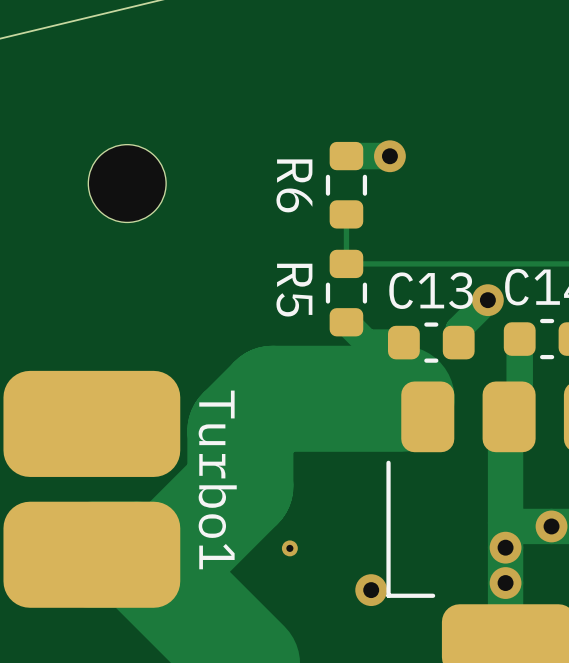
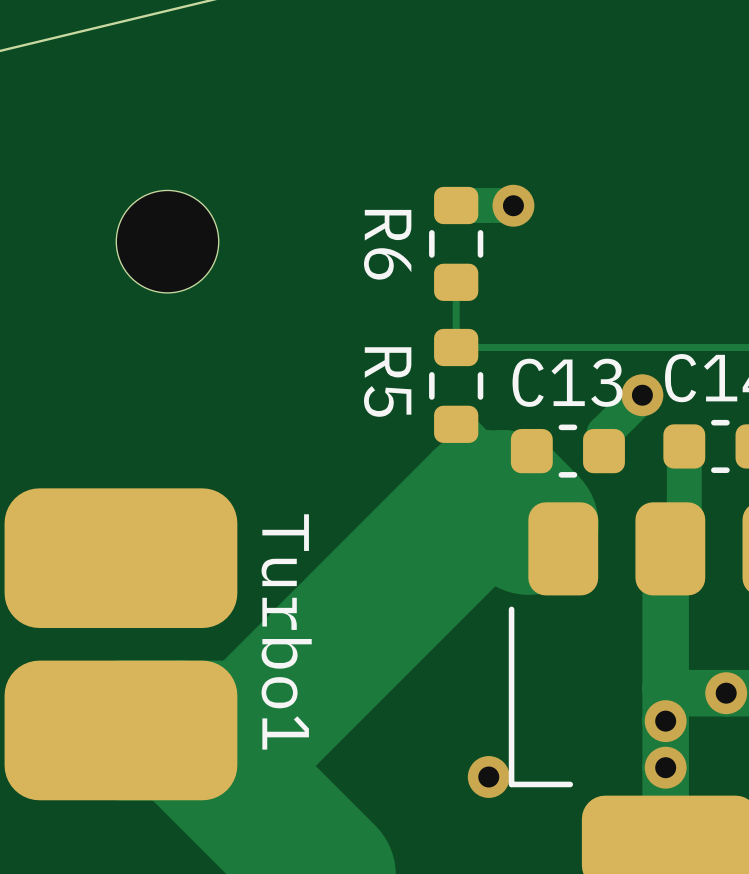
track: (401, 398) (272, 398) (240, 430) (240, 486) (171, 554) -> (528, 525) (503, 500) (482, 500) (252, 730) (226, 730)
via: (289, 548) -> none

